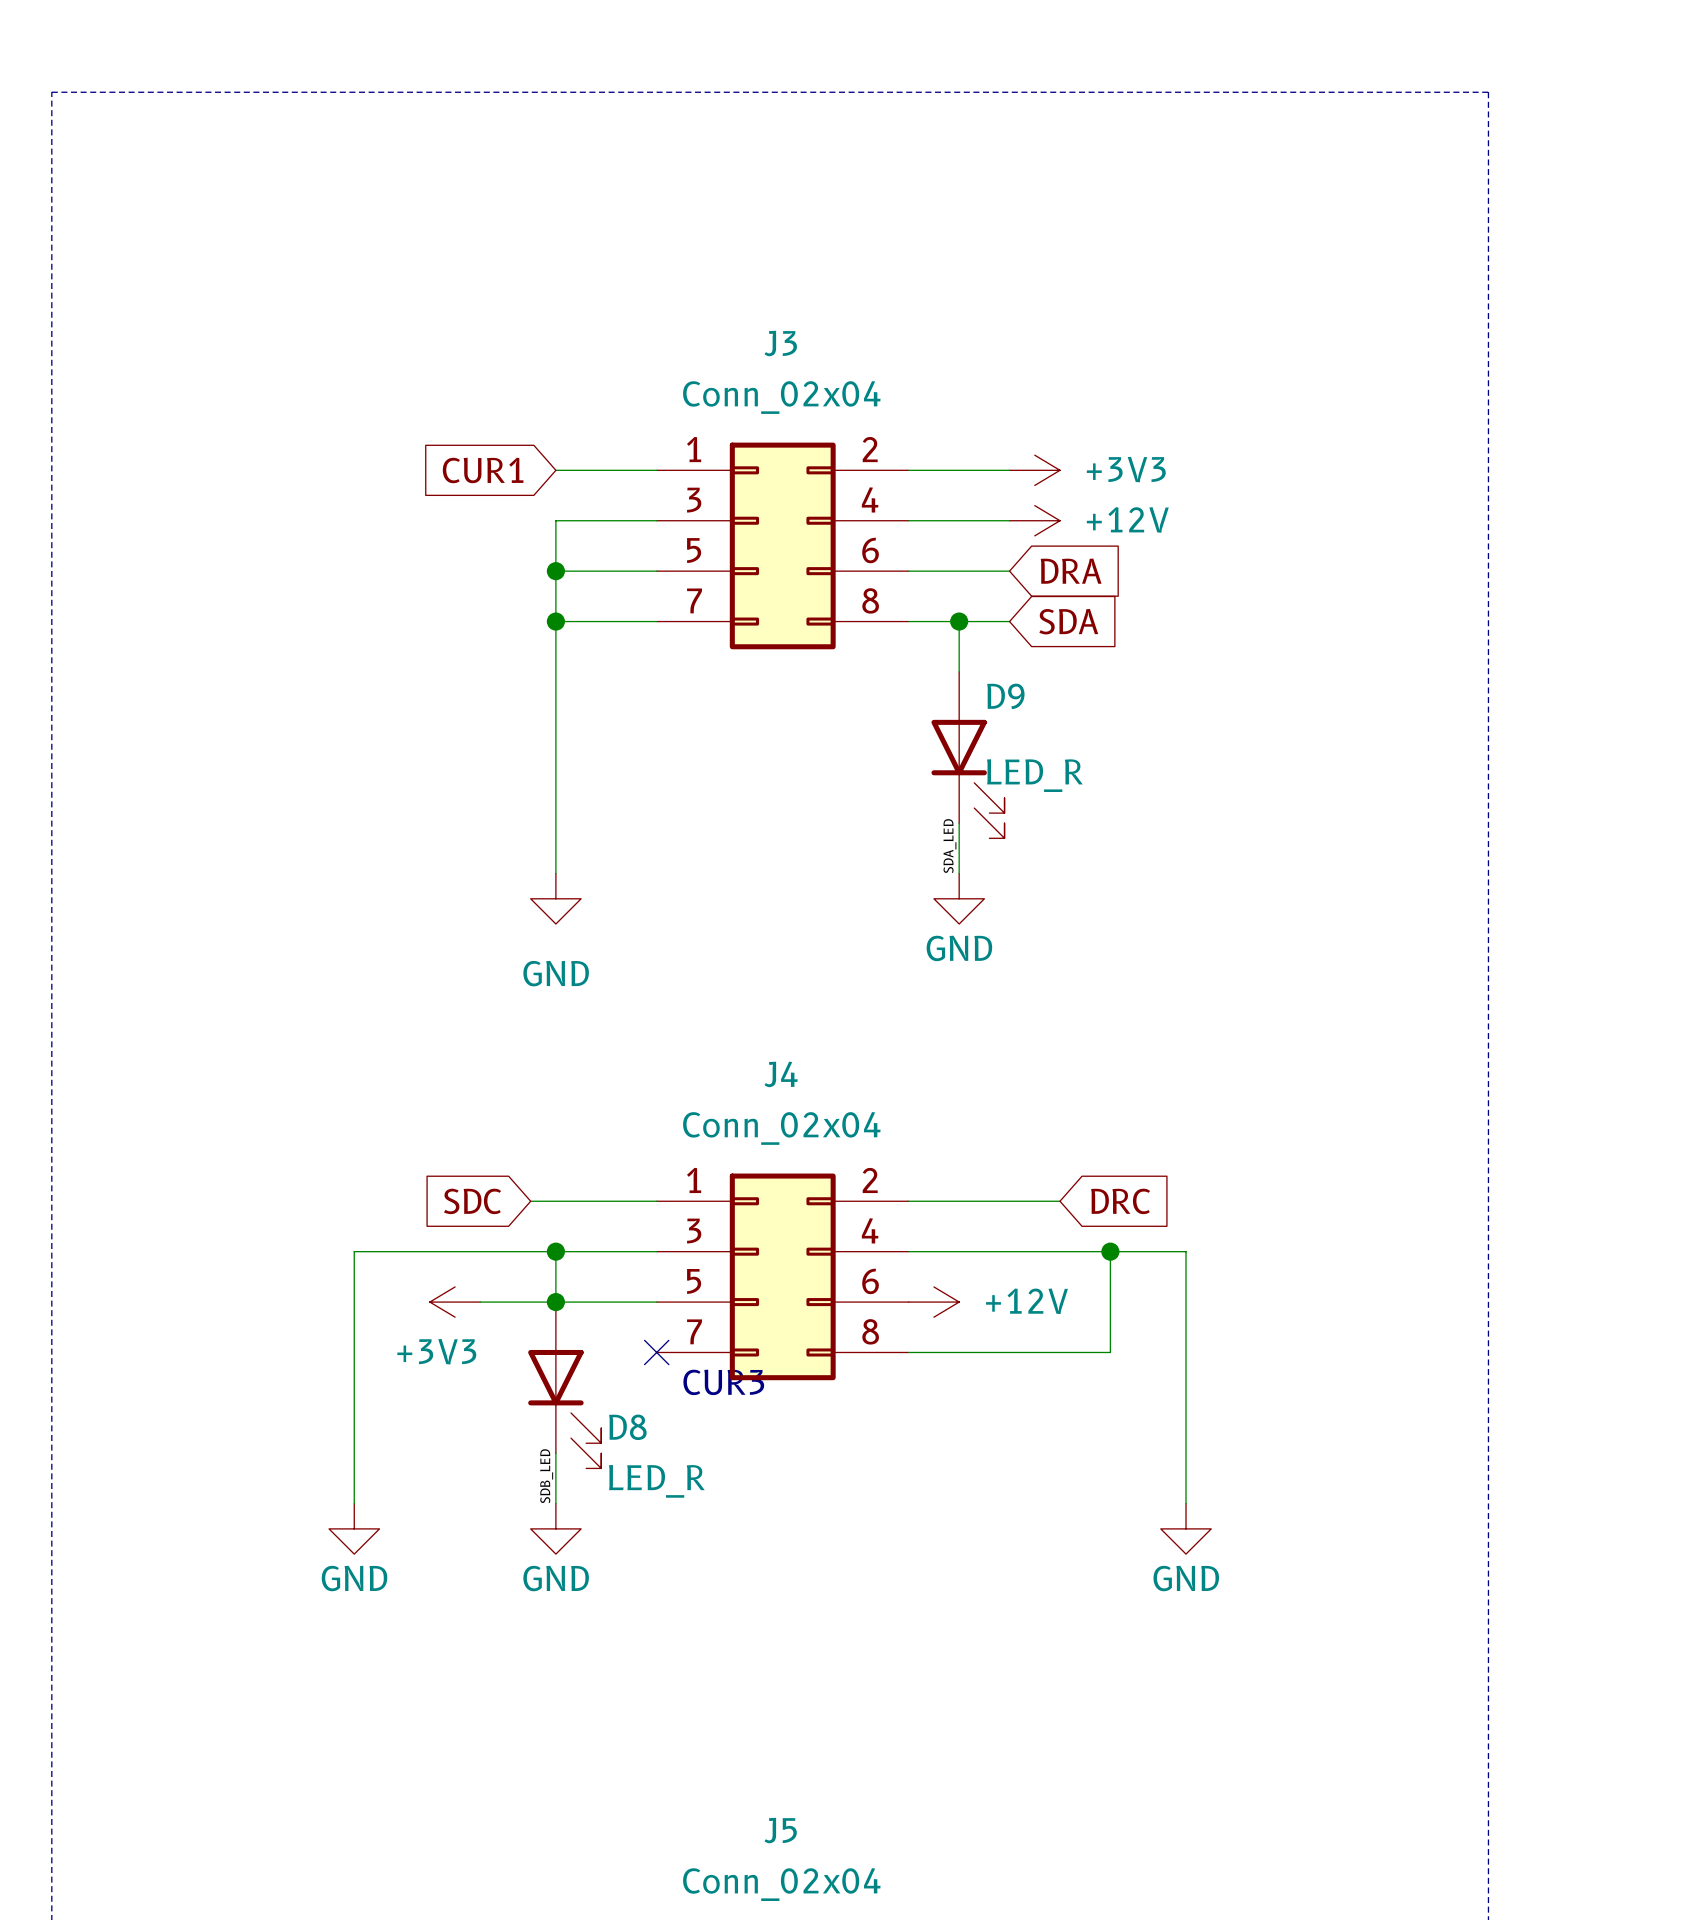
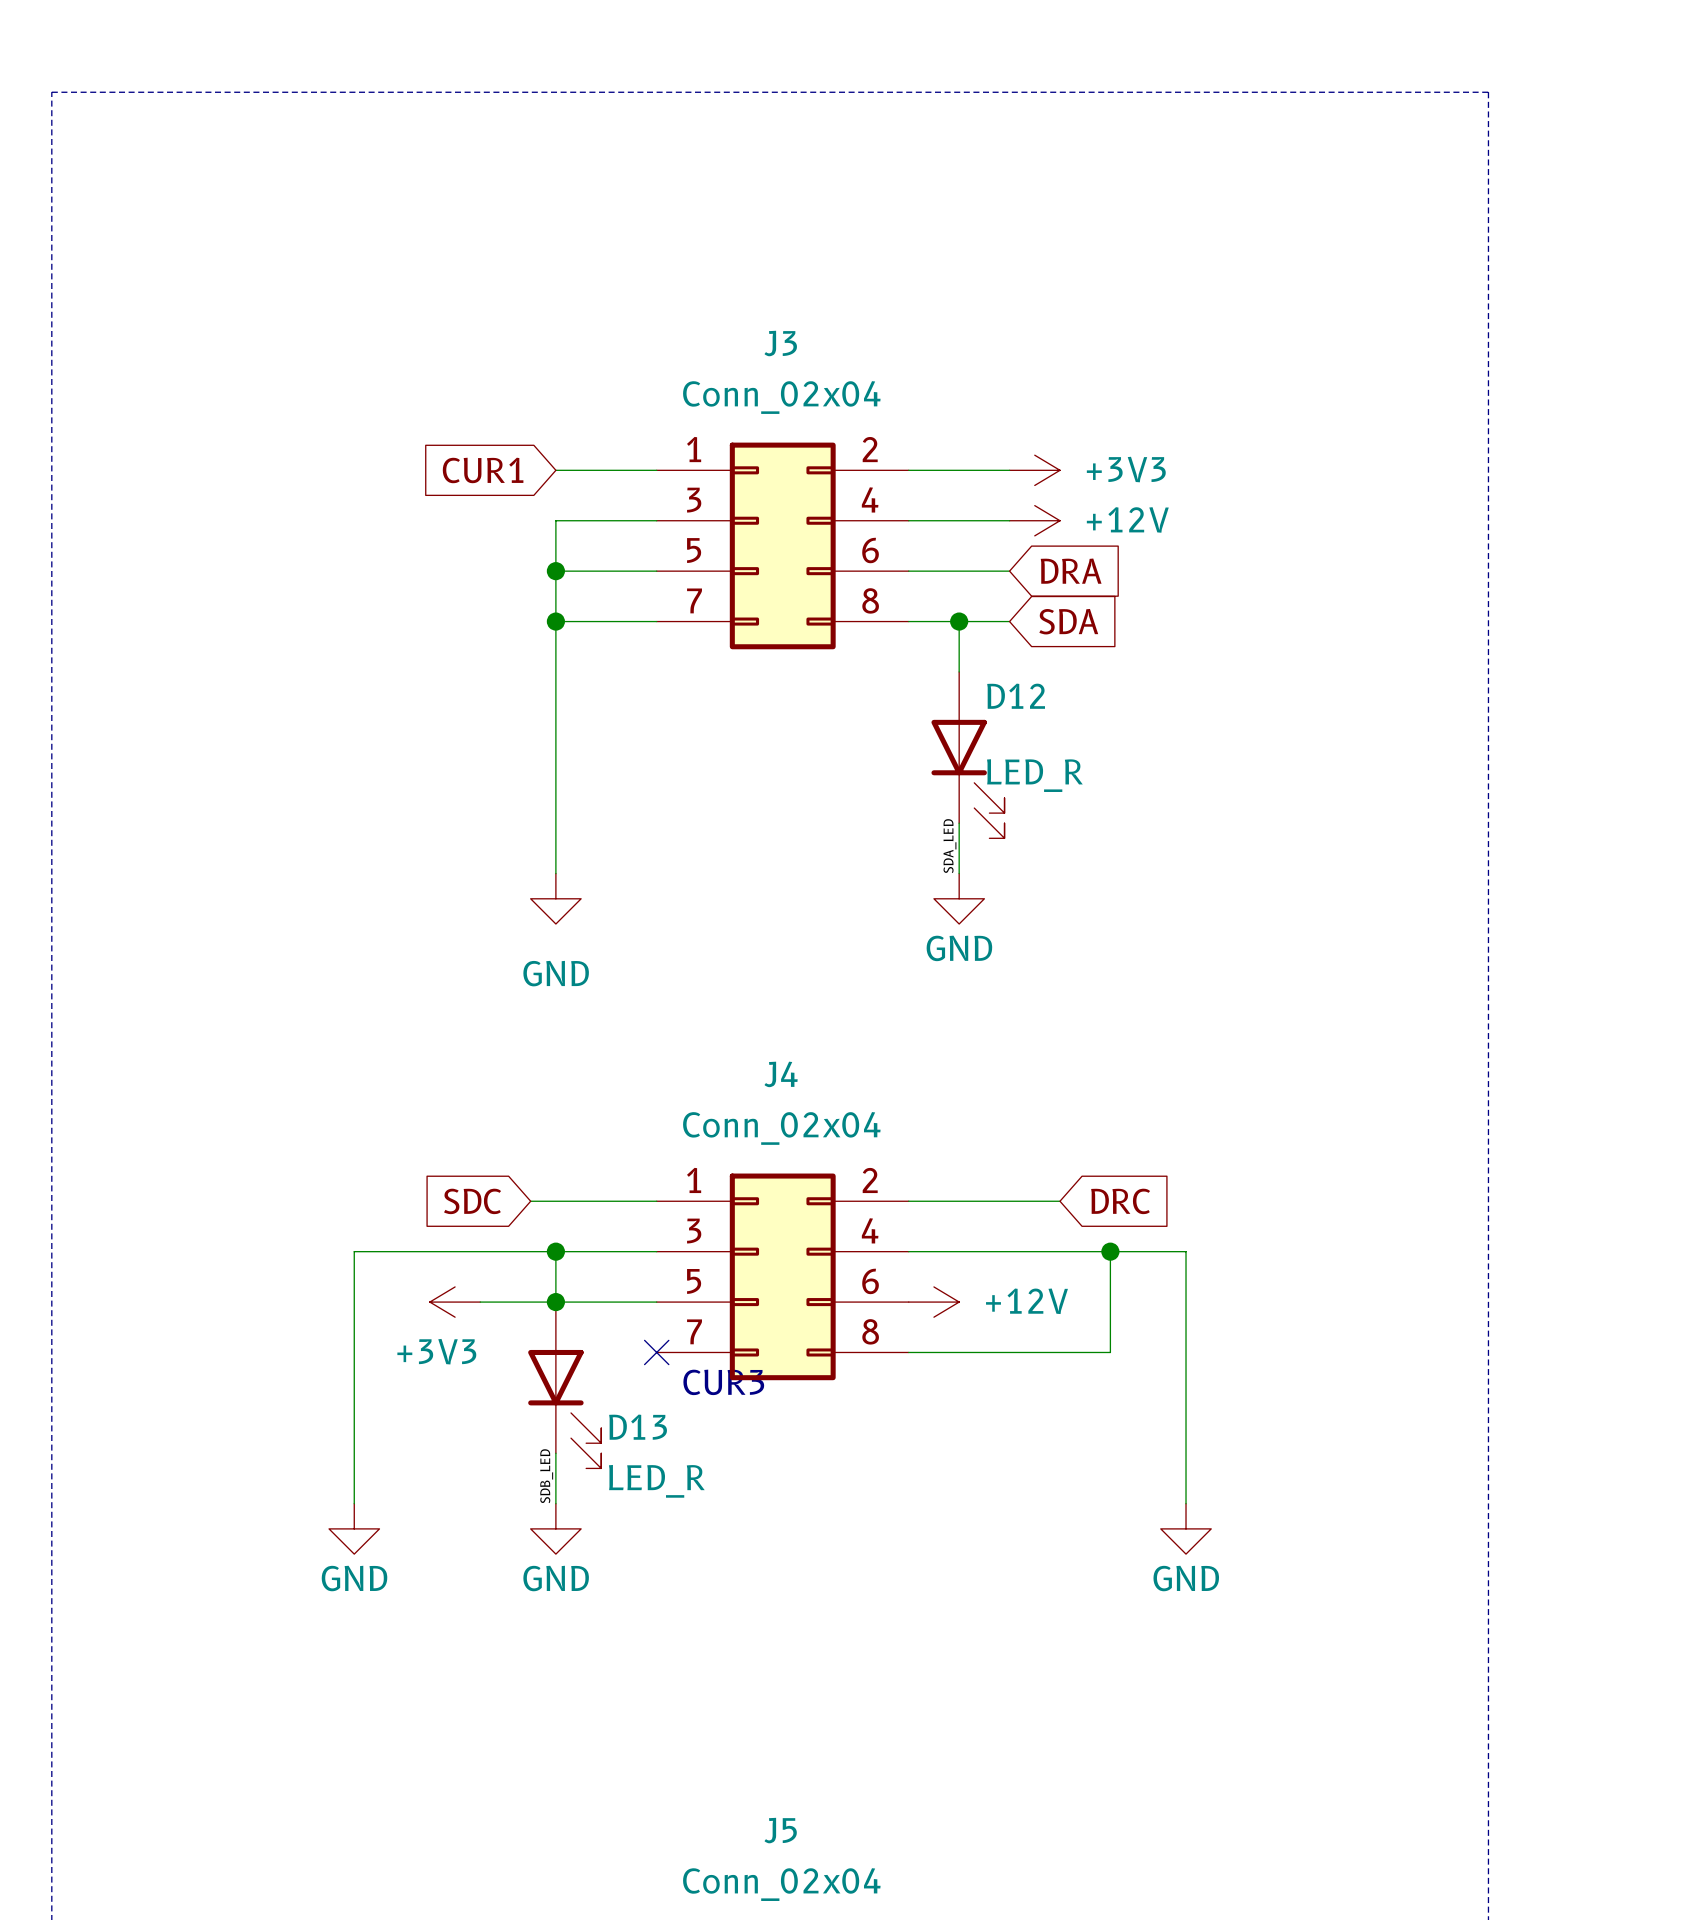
D9 name: D9 (1005, 696) -> D12 (1016, 696)
D8 name: D8 (627, 1427) -> D13 (638, 1427)

